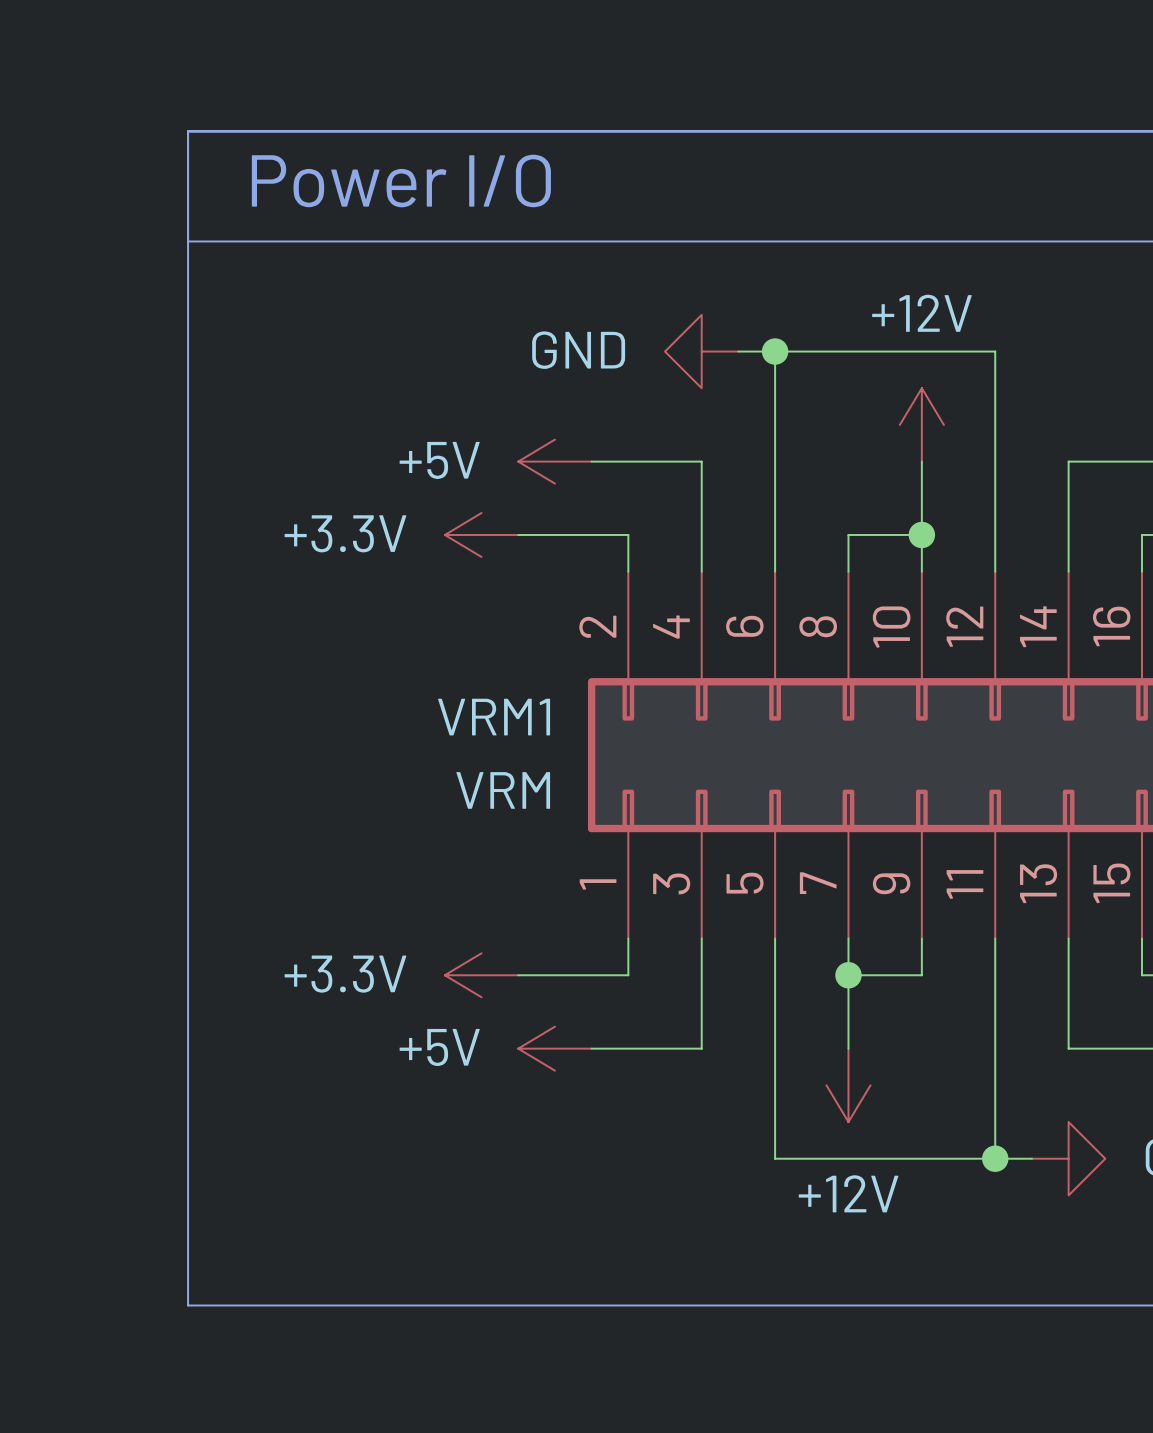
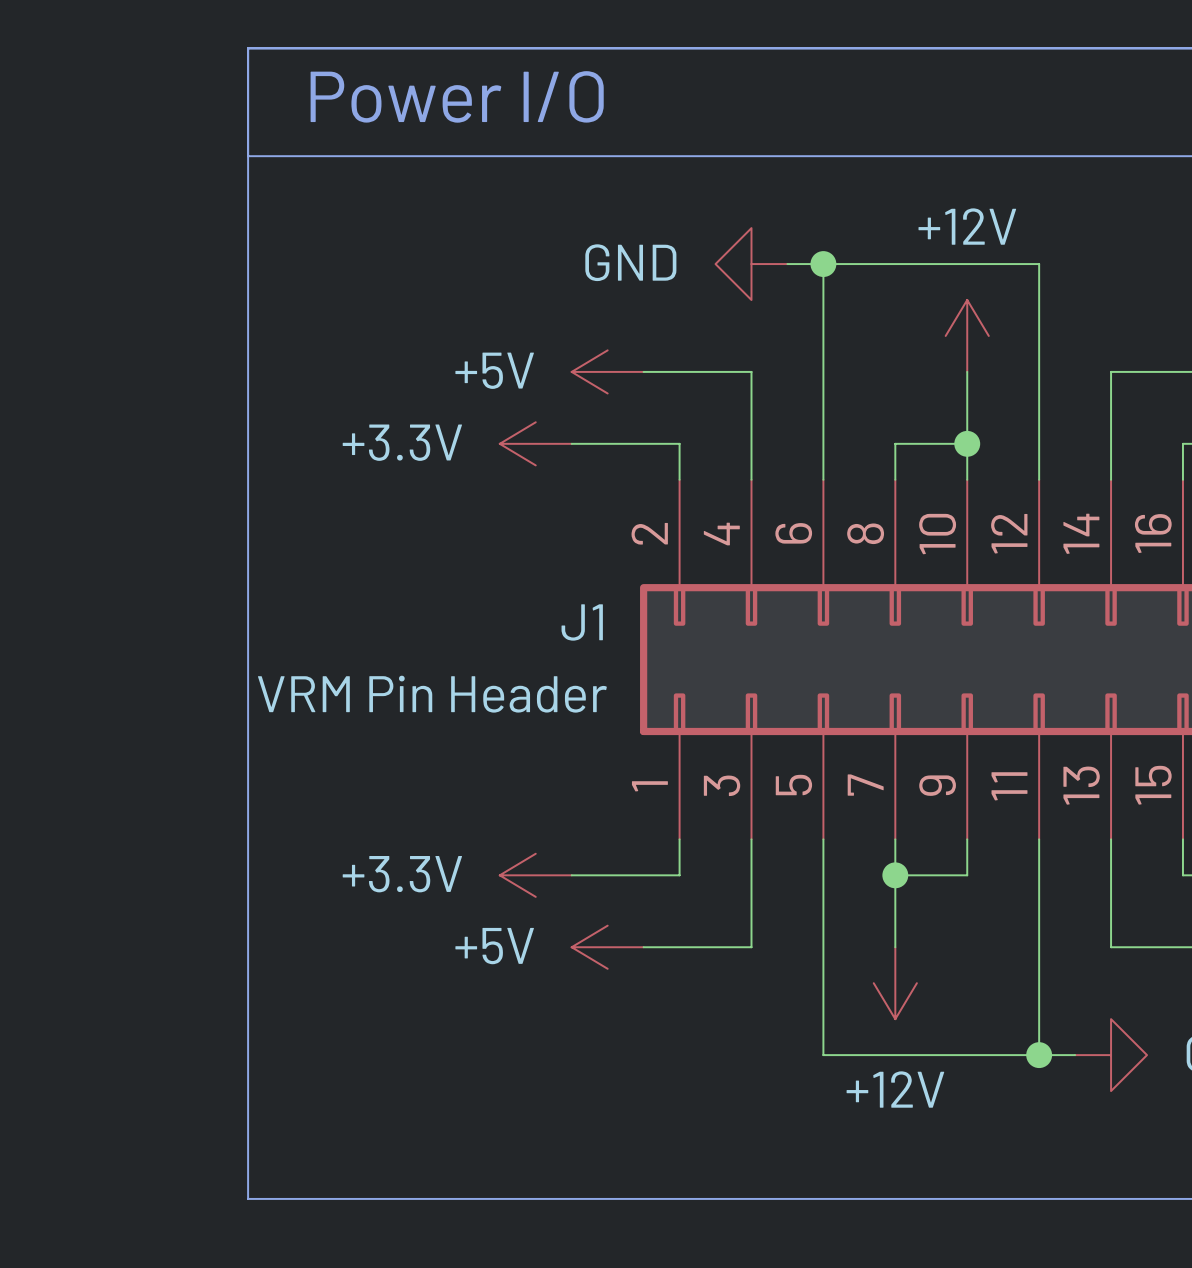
VRM1 name: VRM1 (494, 717) -> J1 (582, 622)
VRM1 value: VRM (503, 790) -> VRM Pin Header (432, 694)

